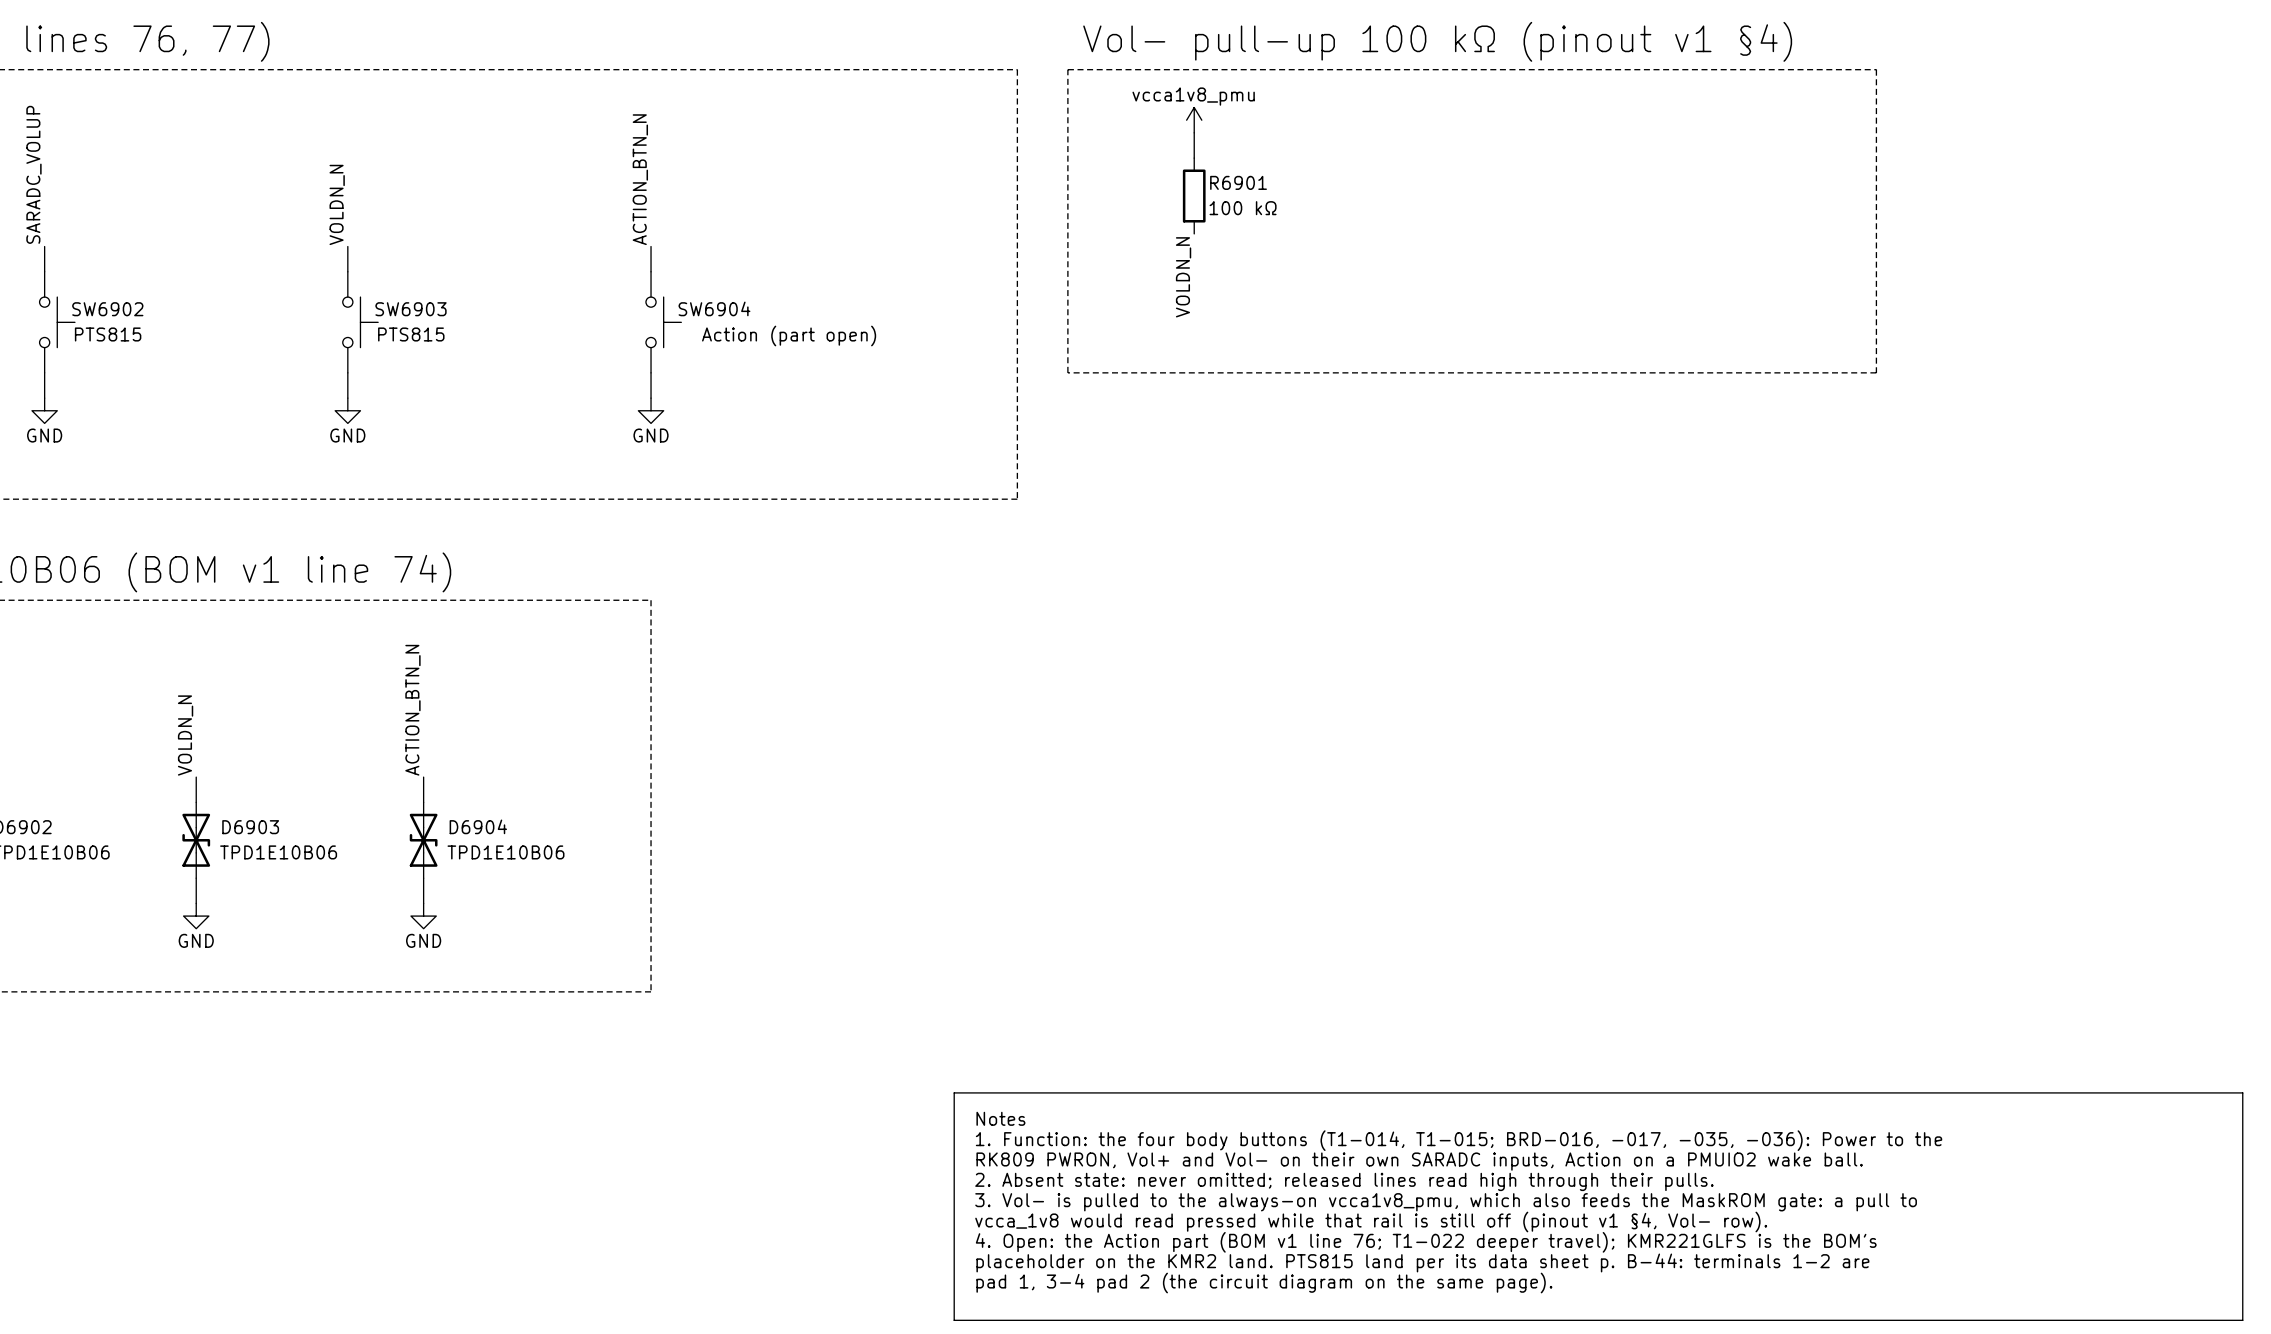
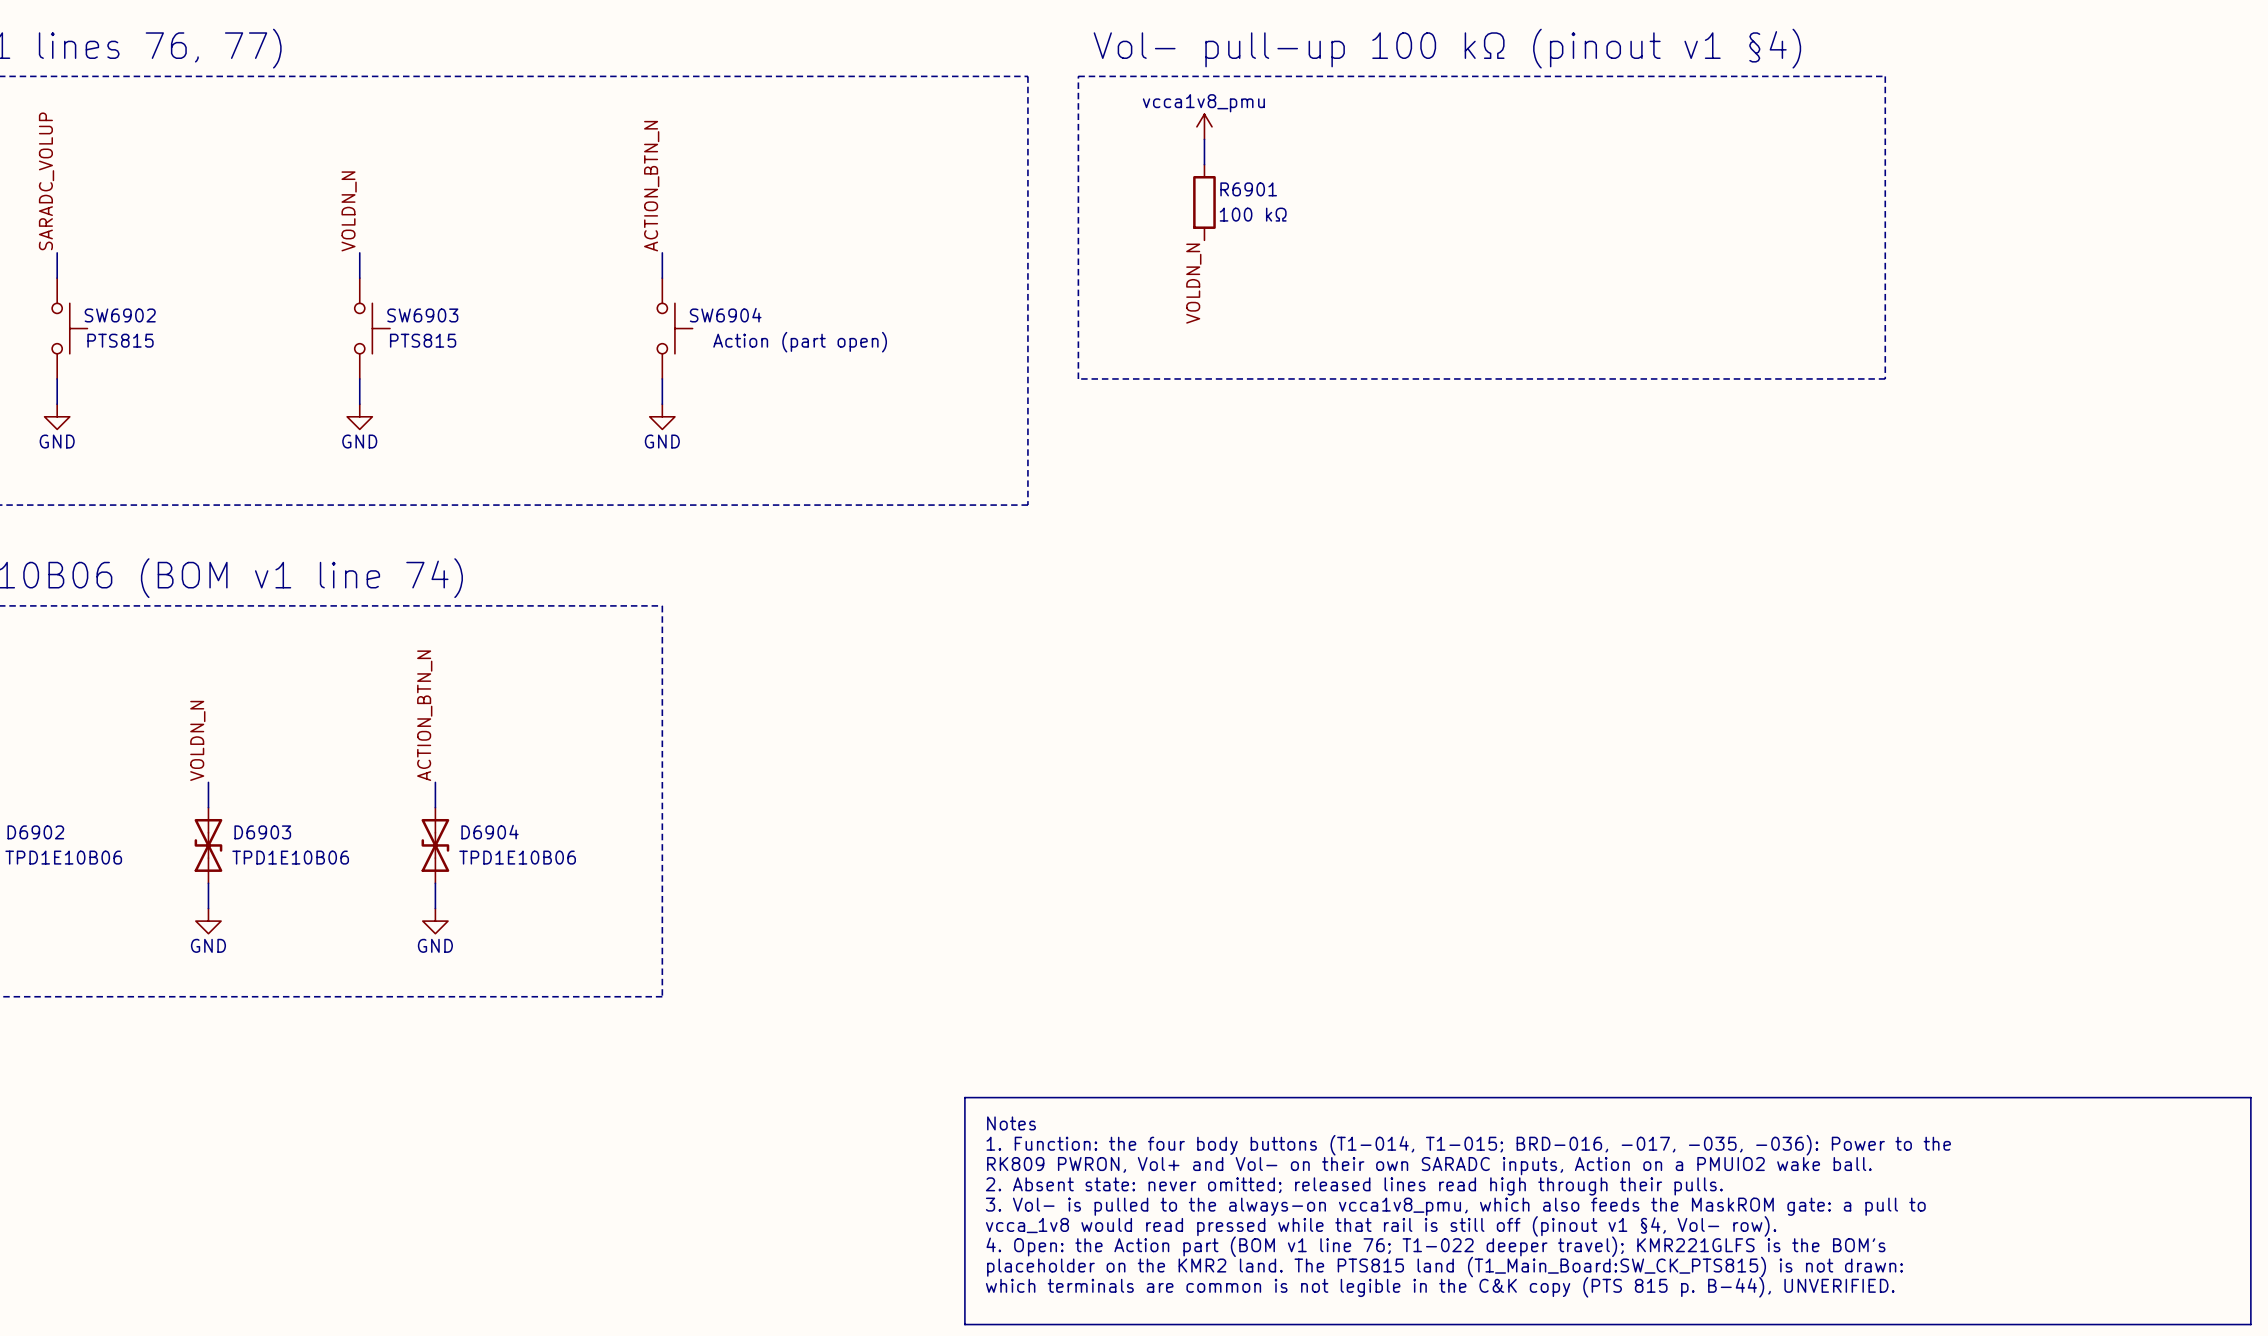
text: placeholder on the KMR2 land. PTS815 land per its data sheet p. B-44: terminals 1-2 are (1422, 1262) -> placeholder on the KMR2 land. The PTS815 land (T1_Main_Board:SW_CK_PTS815) is not drawn: (1444, 1267)
text: pad 1, 3-4 pad 2 (the circuit diagram on the same page). (1264, 1283) -> which terminals are common is not legible in the C&K copy (PTS 815 p. B-44), UNVERIFIED. (1440, 1287)

